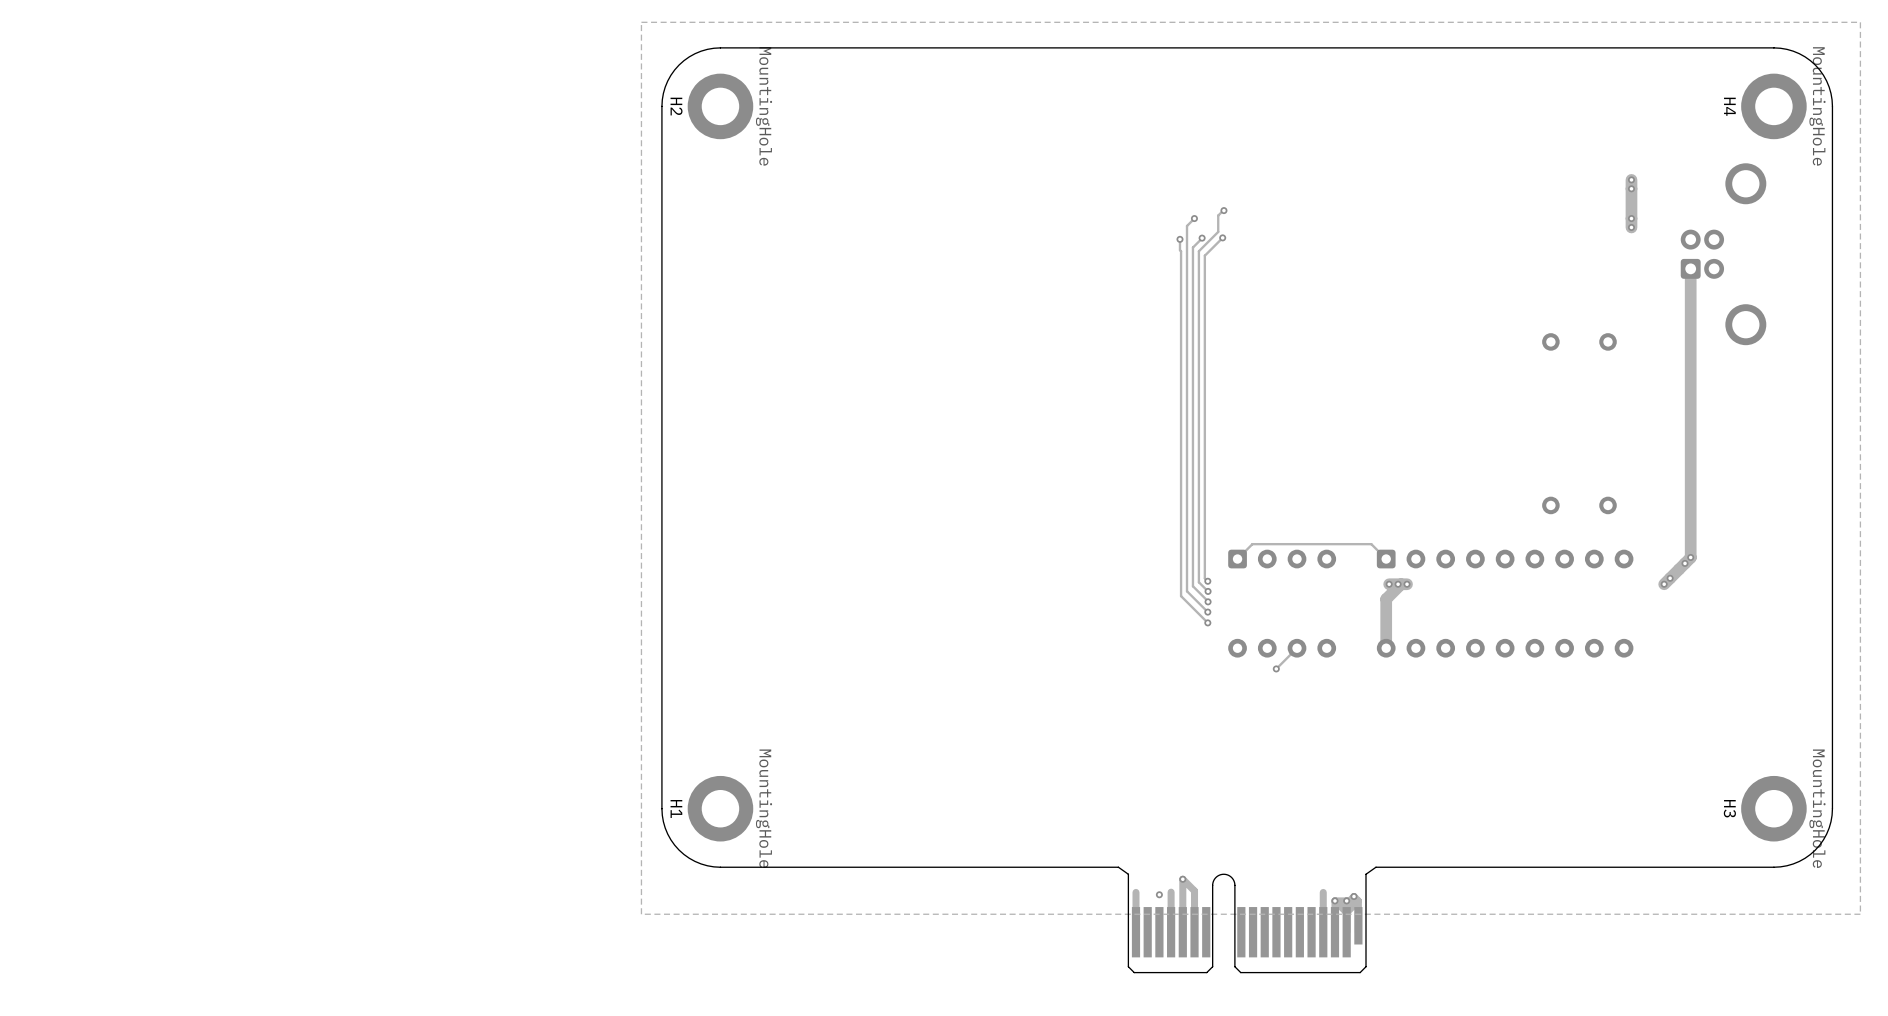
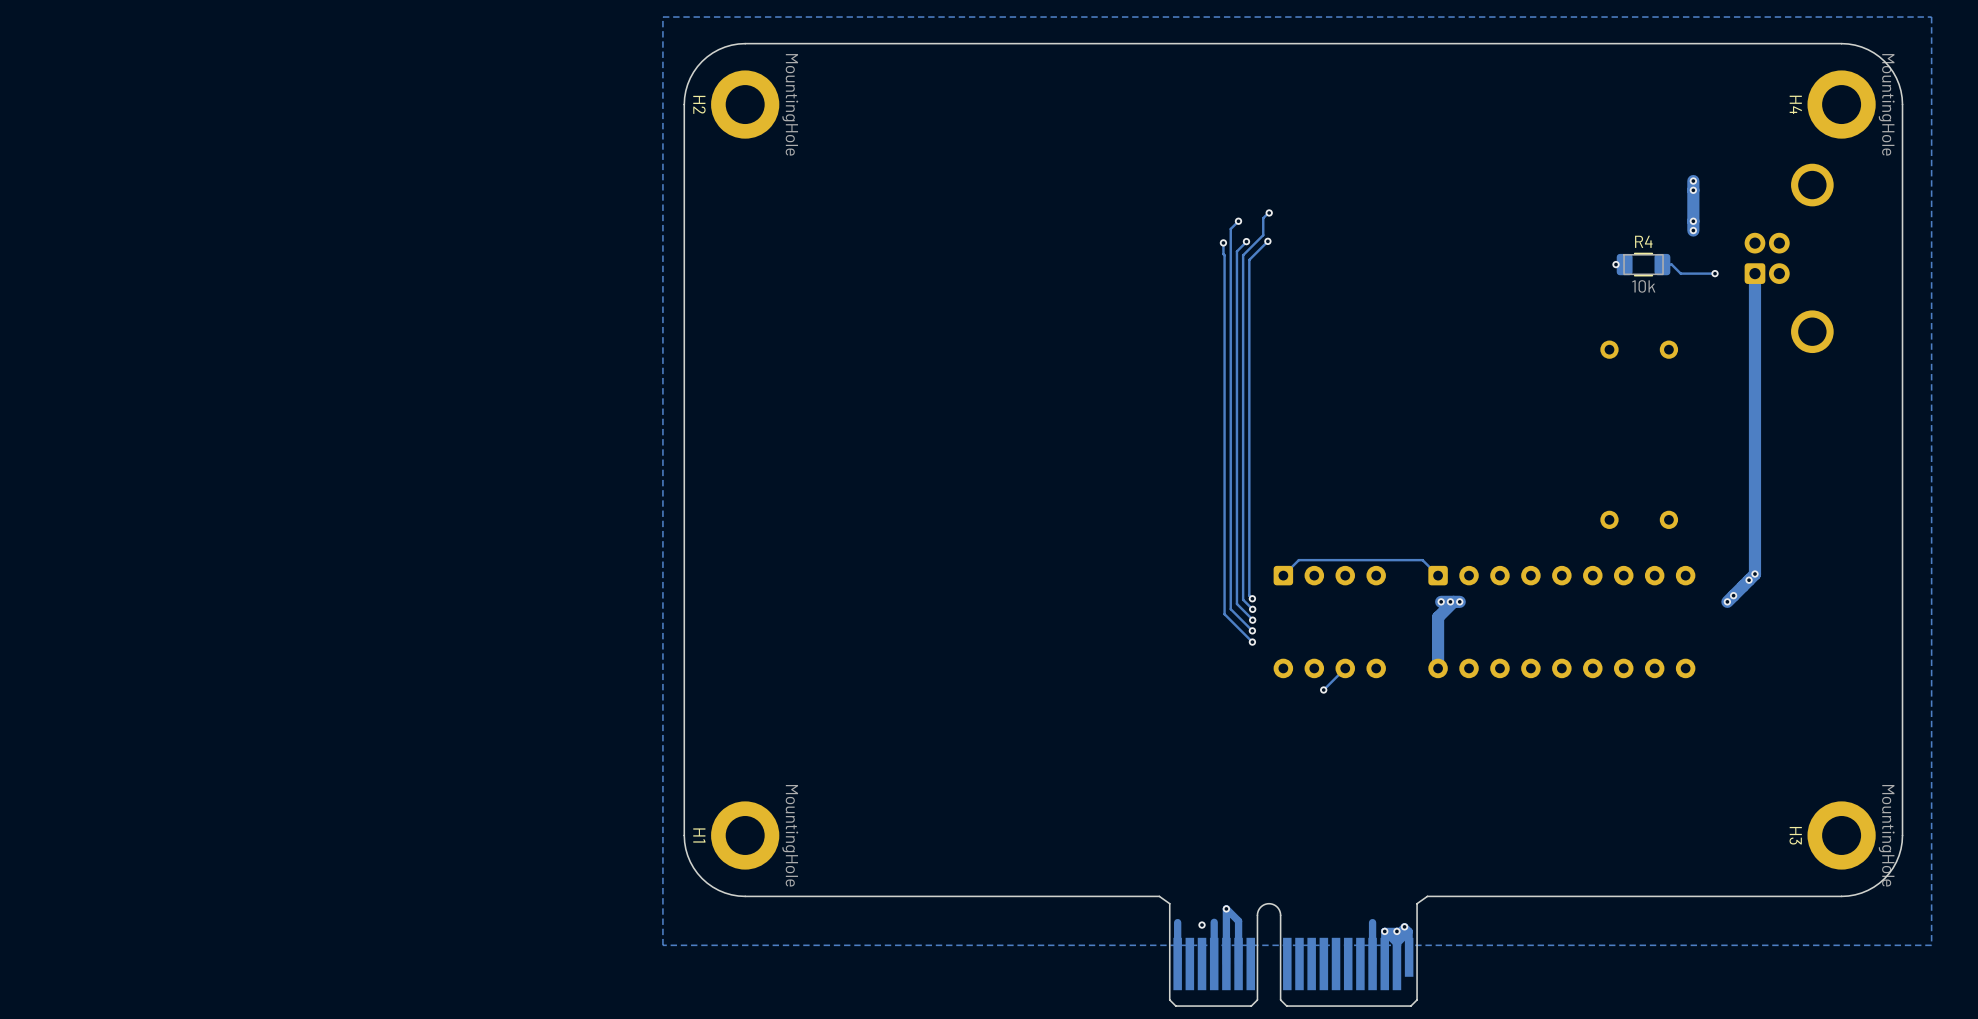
via: none -> (1616, 264)
R4: none -> 10k (1643, 264)
track: none -> (1662, 264) (1671, 264) (1680, 273) (1715, 273)
via: none -> (1715, 273)

